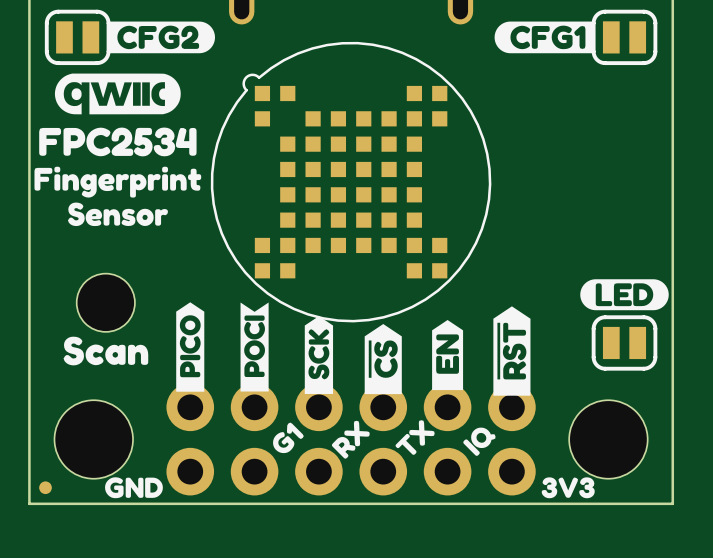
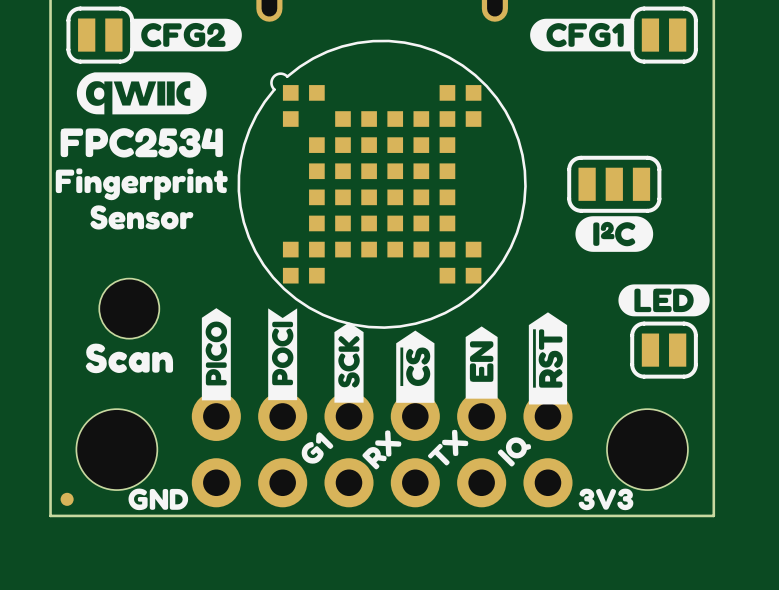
part: none -> (614, 184)
drawing: none -> [575, 216, 654, 252]

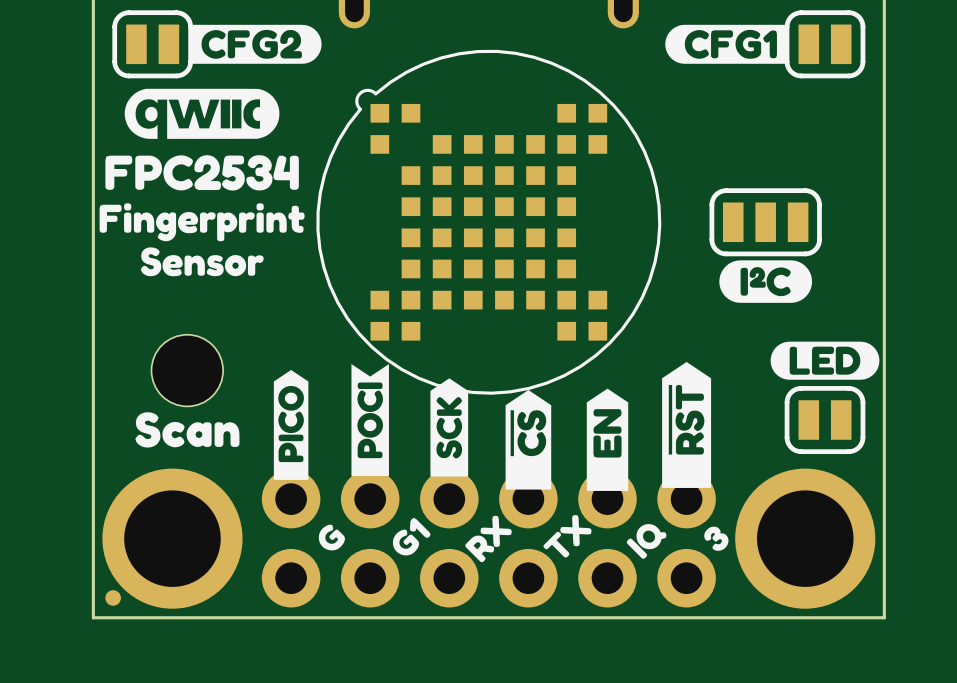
drawing shape: [268, 308, 298, 401] -> [351, 364, 389, 476]
drawing shape: [528, 312, 568, 405] -> [662, 361, 712, 488]
drawing shape: [334, 322, 364, 403] -> [430, 378, 469, 477]
drawing shape: [465, 326, 498, 399] -> [586, 388, 629, 491]
drawing shape: [396, 330, 435, 403] -> [505, 390, 552, 490]
part footprint: [76, 409, 158, 491] -> [102, 468, 243, 609]
part footprint: [606, 409, 688, 491] -> [735, 468, 876, 609]
drawing: none -> [318, 524, 345, 551]
drawing: none -> [704, 526, 729, 551]
drawing: [128, 488, 189, 511] -> none
drawing: [578, 488, 634, 511] -> none

